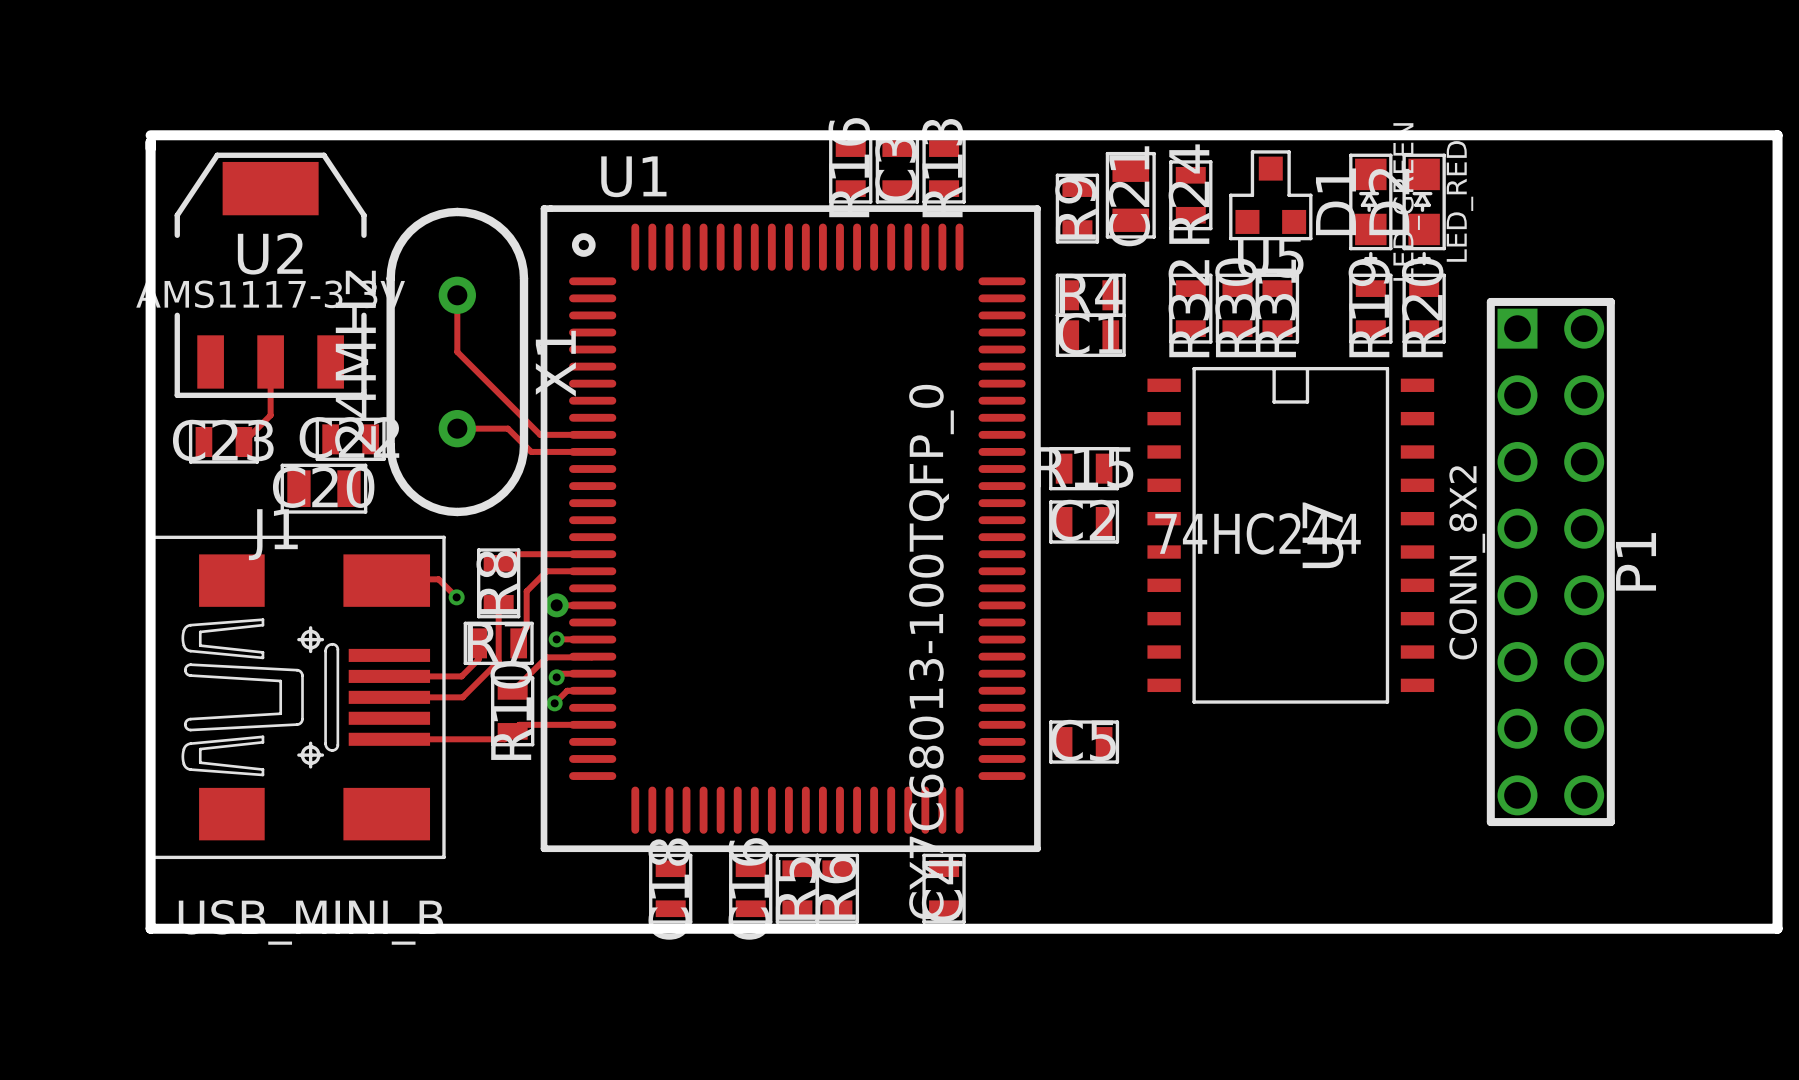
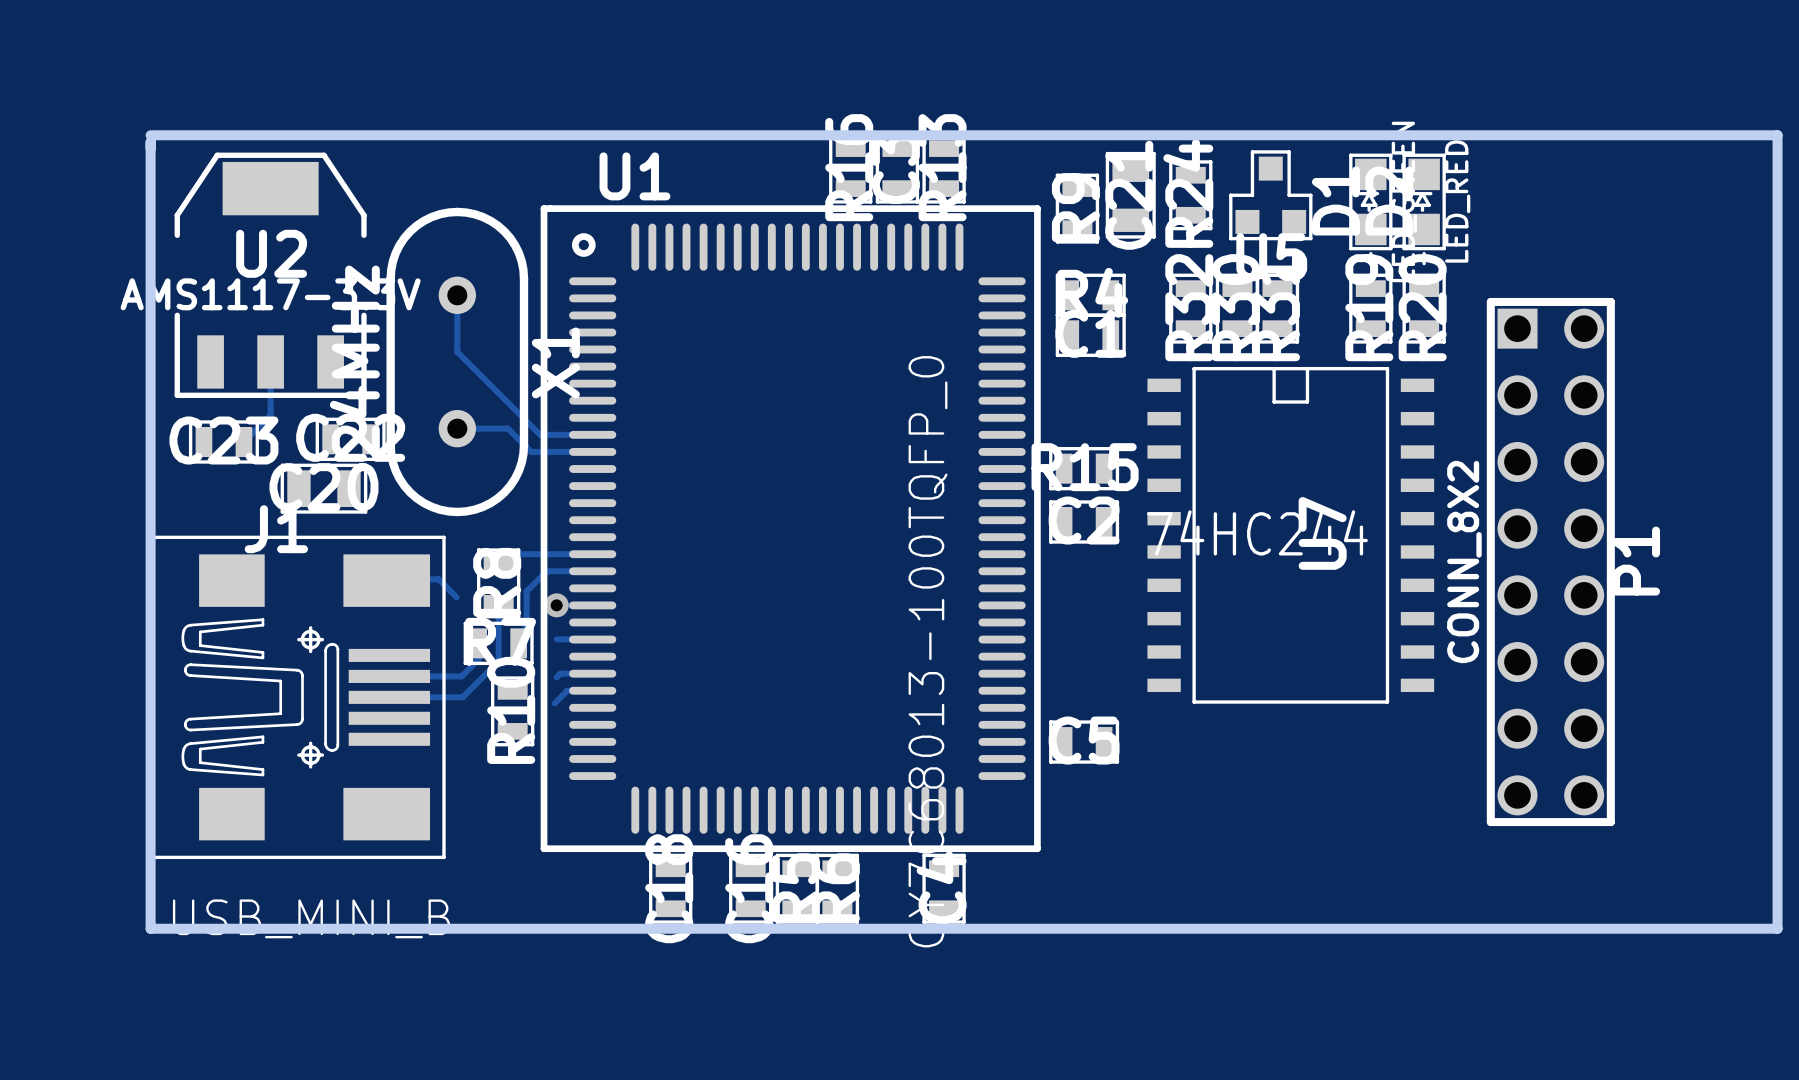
via: (456, 597) -> none
via: (556, 639) -> none
track: (592, 656) (546, 657) (512, 691) -> none
via: (556, 677) -> none
via: (554, 703) -> none
track: (592, 724) (519, 724) (504, 739) (389, 739) -> none

